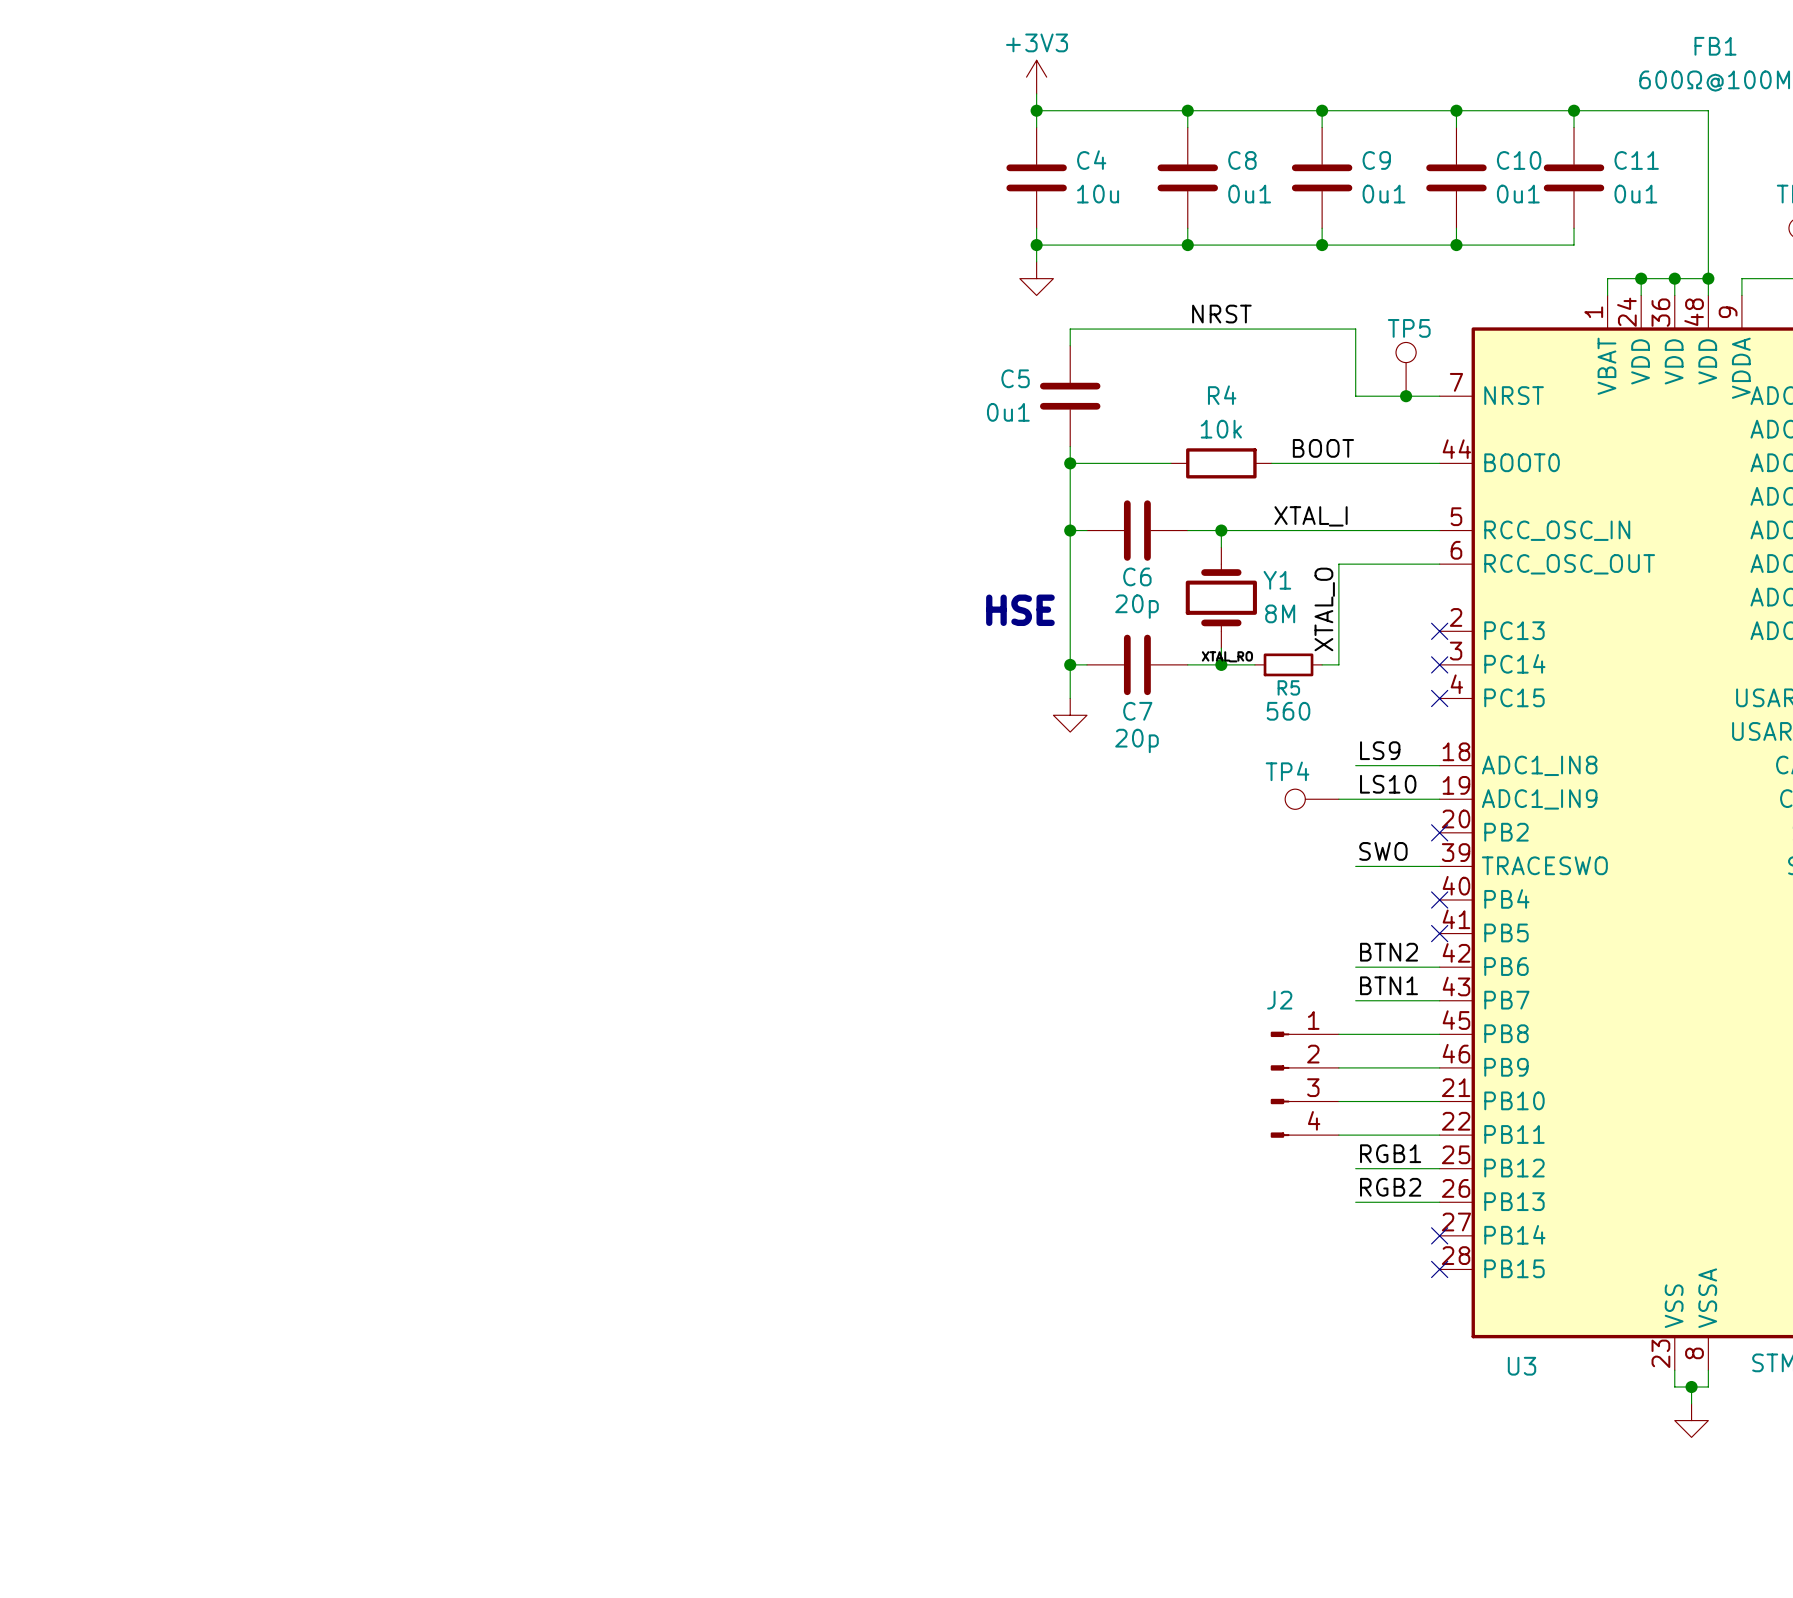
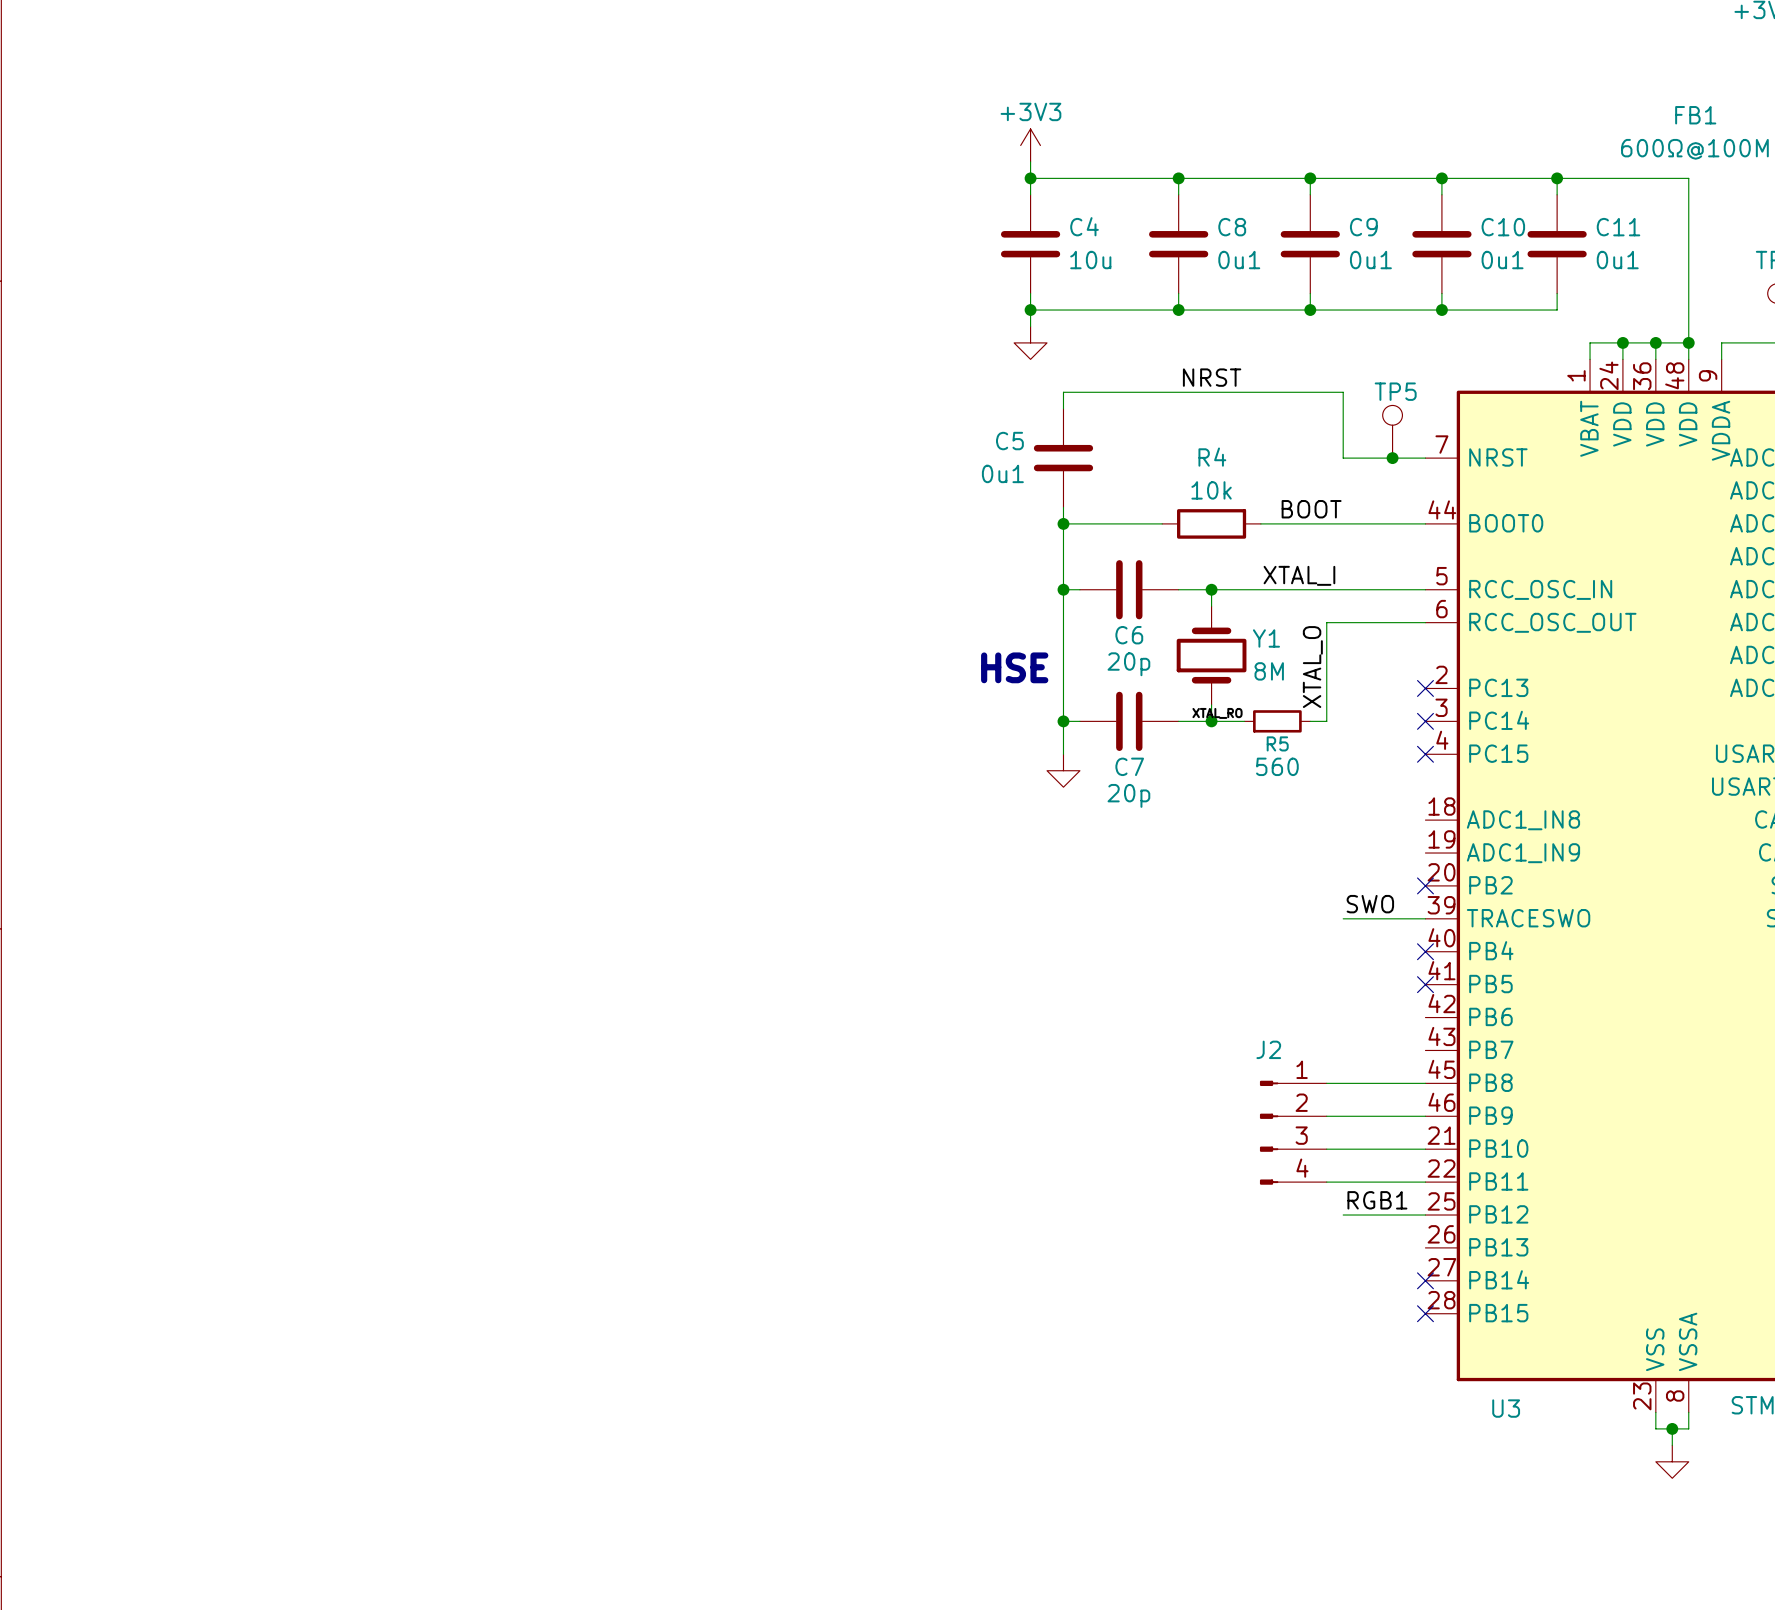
label: LS9 (1380, 750) -> none
wire: (1355, 765) (1439, 765) -> none
label: LS10 (1388, 784) -> none
TP4: (1312, 799) -> none
wire: (1338, 799) (1439, 799) -> none
label: BTN2 (1389, 952) -> none
wire: (1355, 967) (1439, 967) -> none
label: BTN1 (1389, 985) -> none
wire: (1355, 1000) (1439, 1000) -> none
label: RGB2 (1390, 1187) -> none
wire: (1355, 1202) (1439, 1202) -> none

